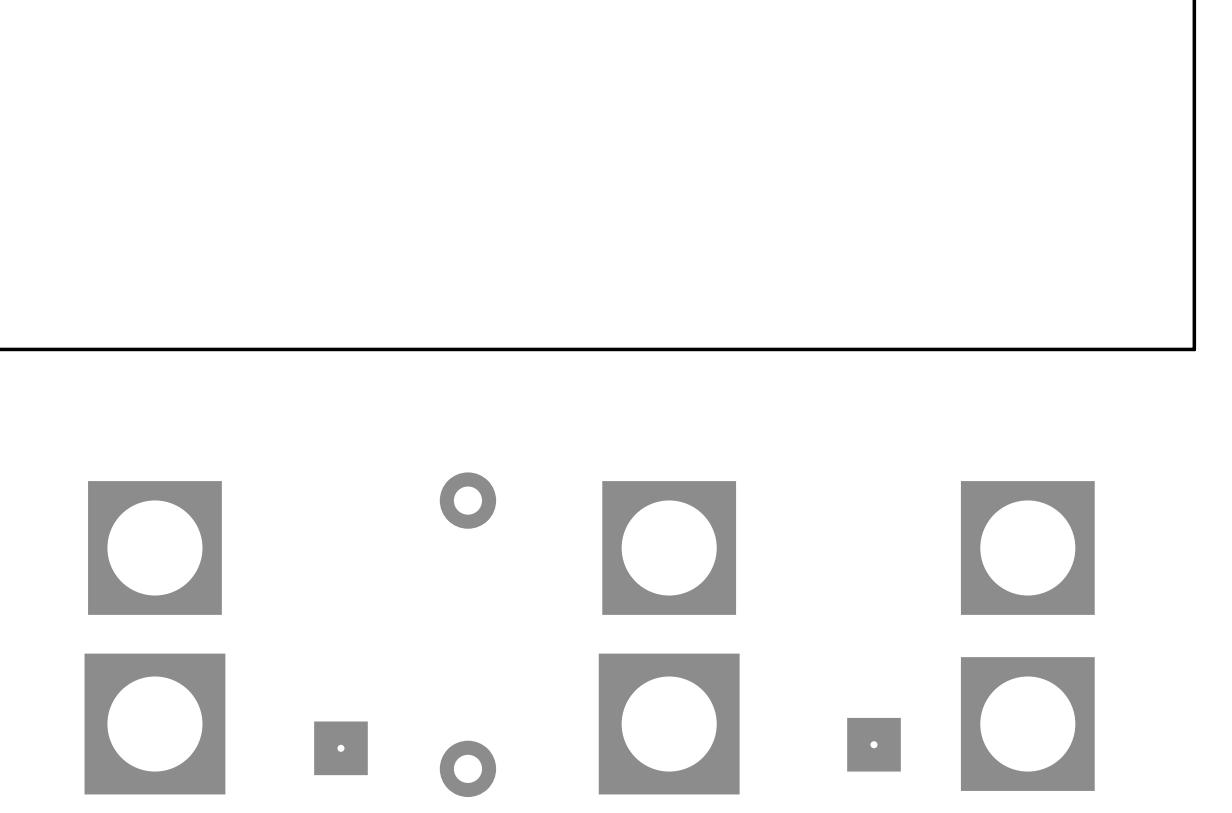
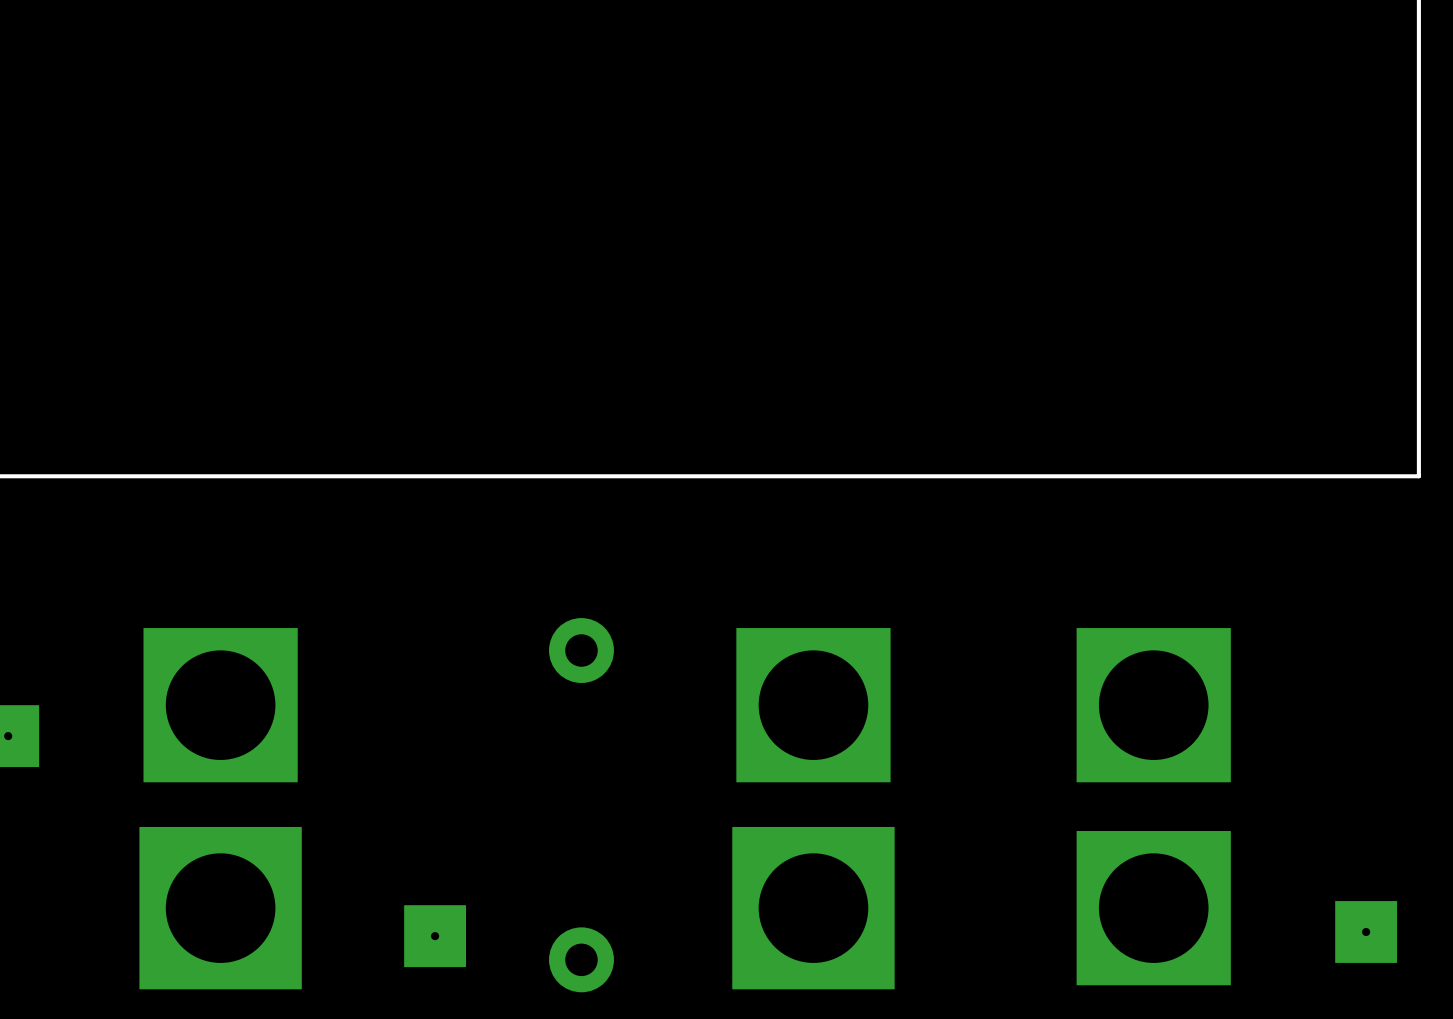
part position: (1027, 636) -> (1153, 806)
part position: (873, 744) -> (1366, 932)

